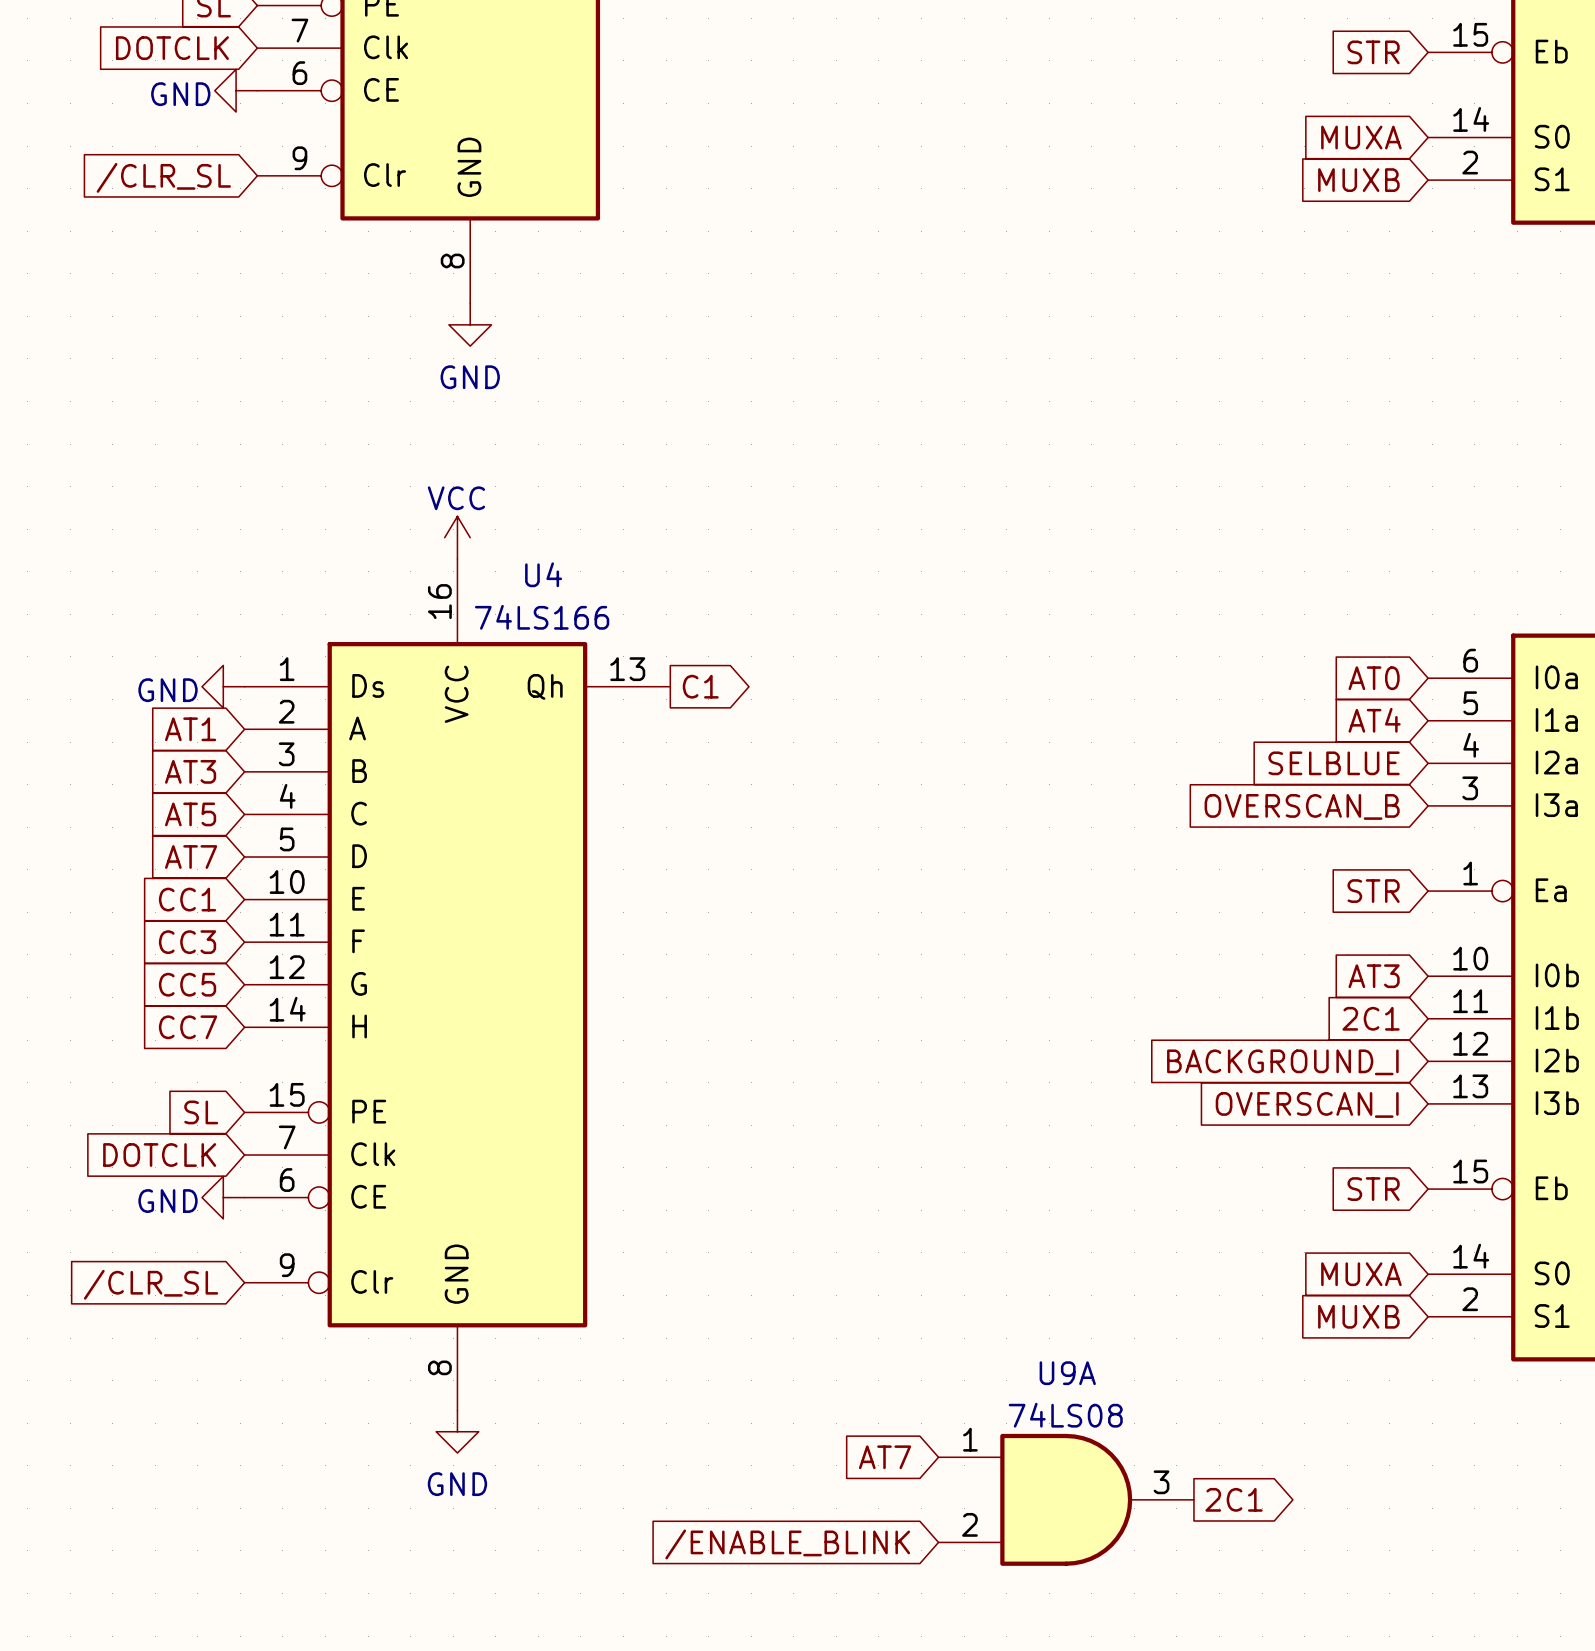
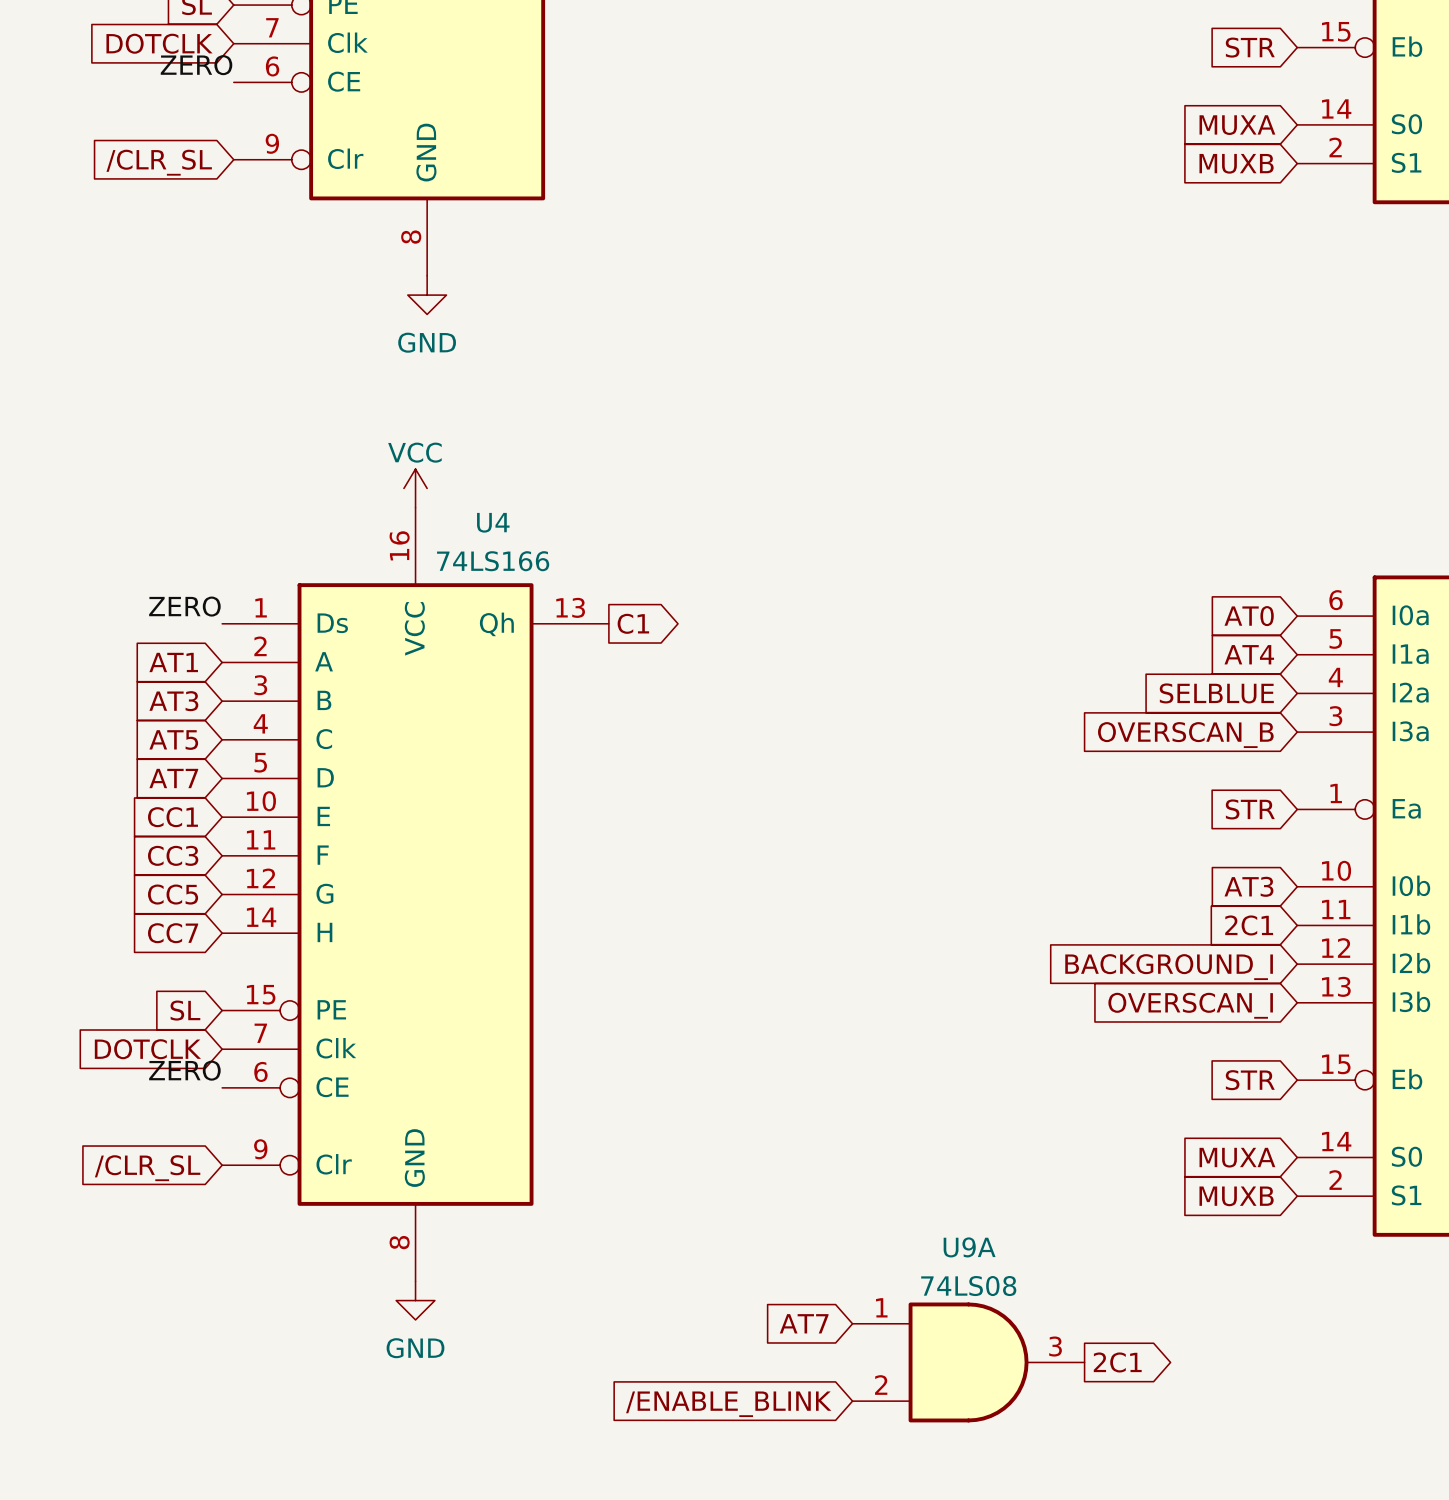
label: none -> ZERO (196, 65)
power symbol: GND (236, 90) -> none
label: none -> ZERO (184, 606)
power symbol: GND (223, 686) -> none
label: none -> ZERO (184, 1070)
power symbol: GND (223, 1197) -> none

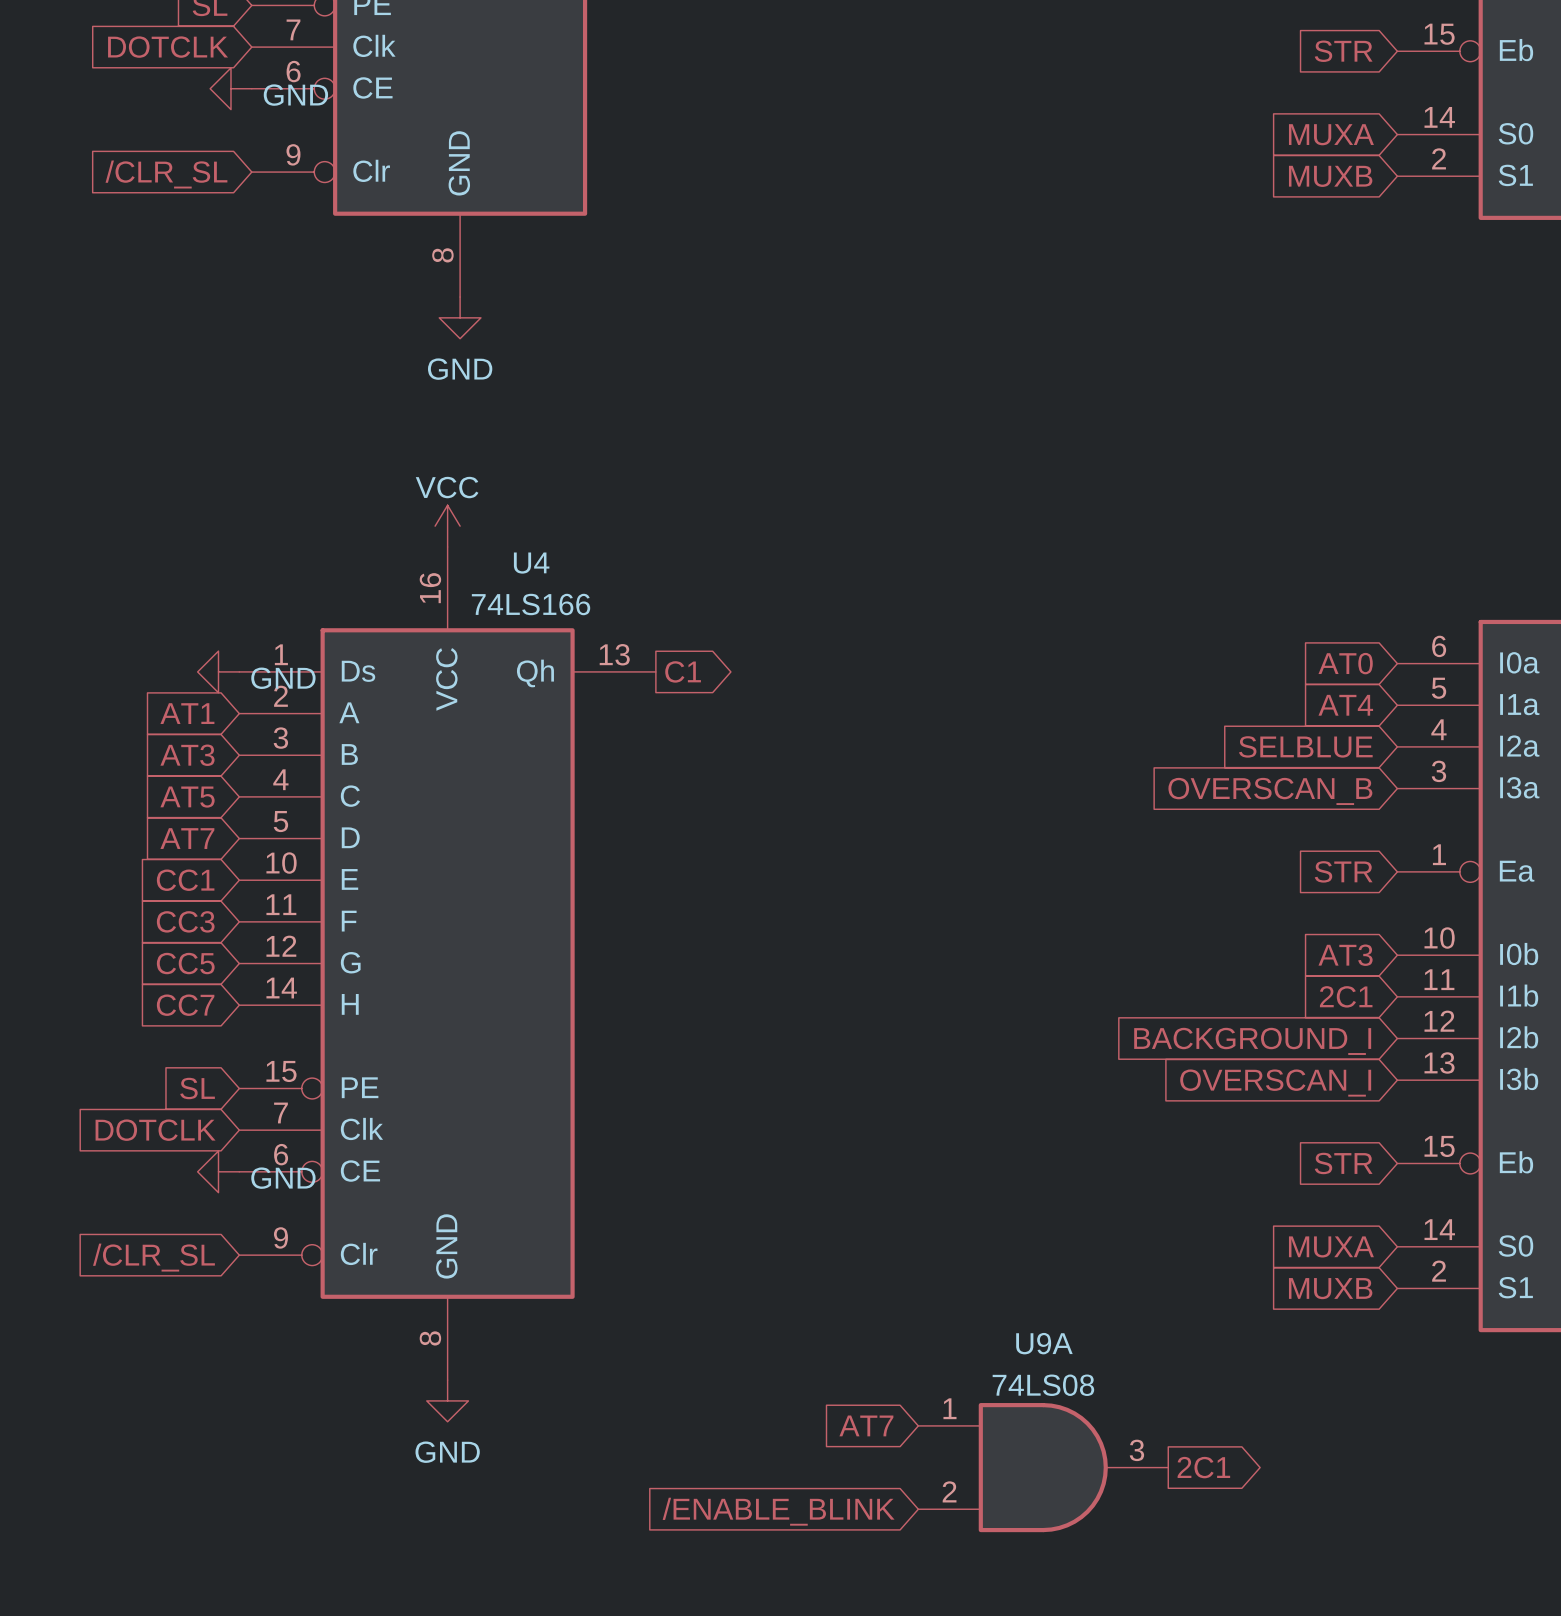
label: ZERO (196, 65) -> none
power symbol: none -> GND (230, 88)
label: ZERO (184, 606) -> none
power symbol: none -> GND (218, 671)
label: ZERO (184, 1070) -> none
power symbol: none -> GND (218, 1171)

